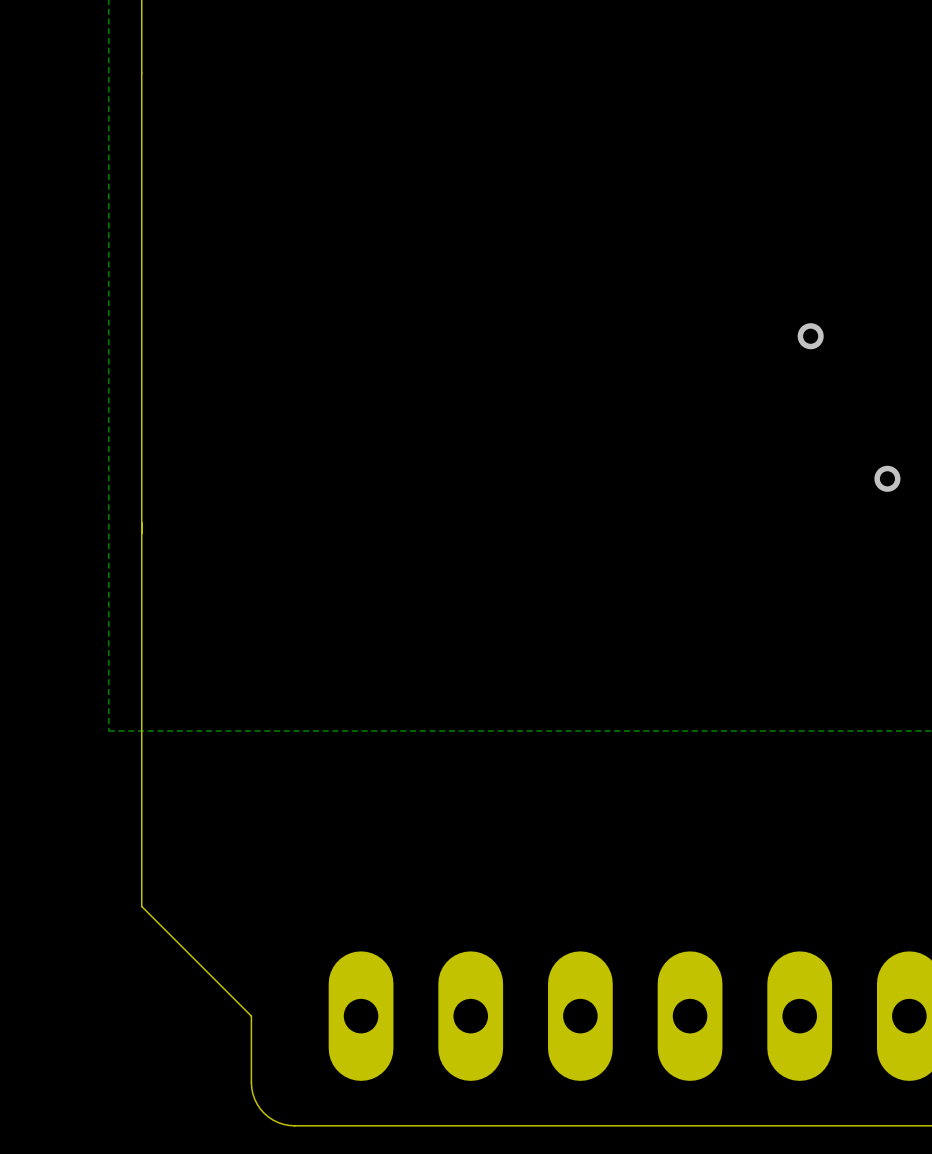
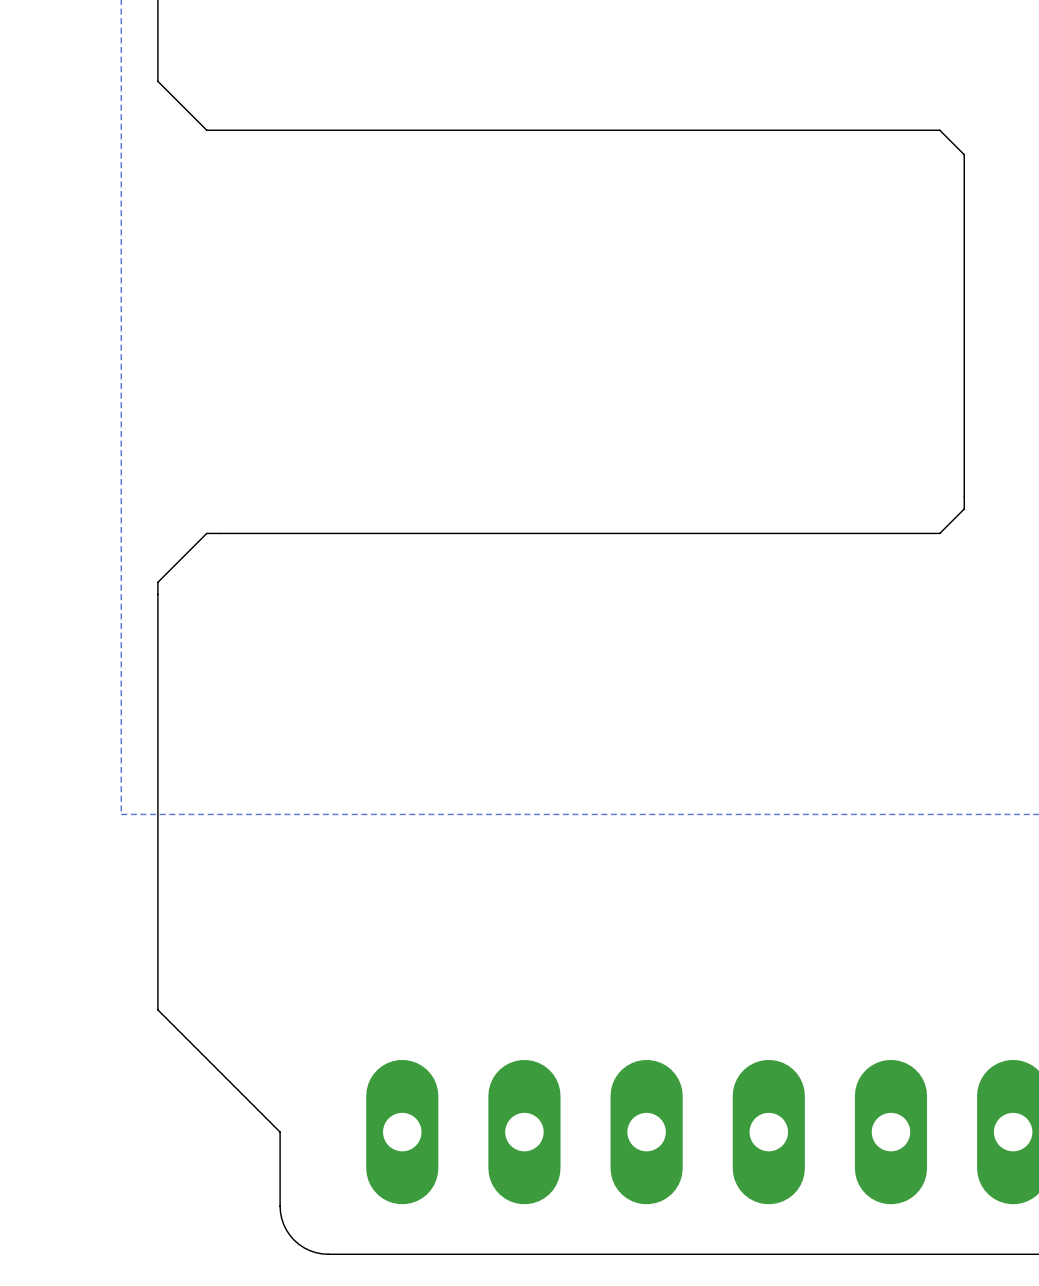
board edge: (141, 73) (141, 522) -> (157, 81) (206, 130) (939, 130) (964, 154) (964, 509) (939, 533) (206, 533) (157, 582)
via: (810, 336) -> none
via: (887, 478) -> none

